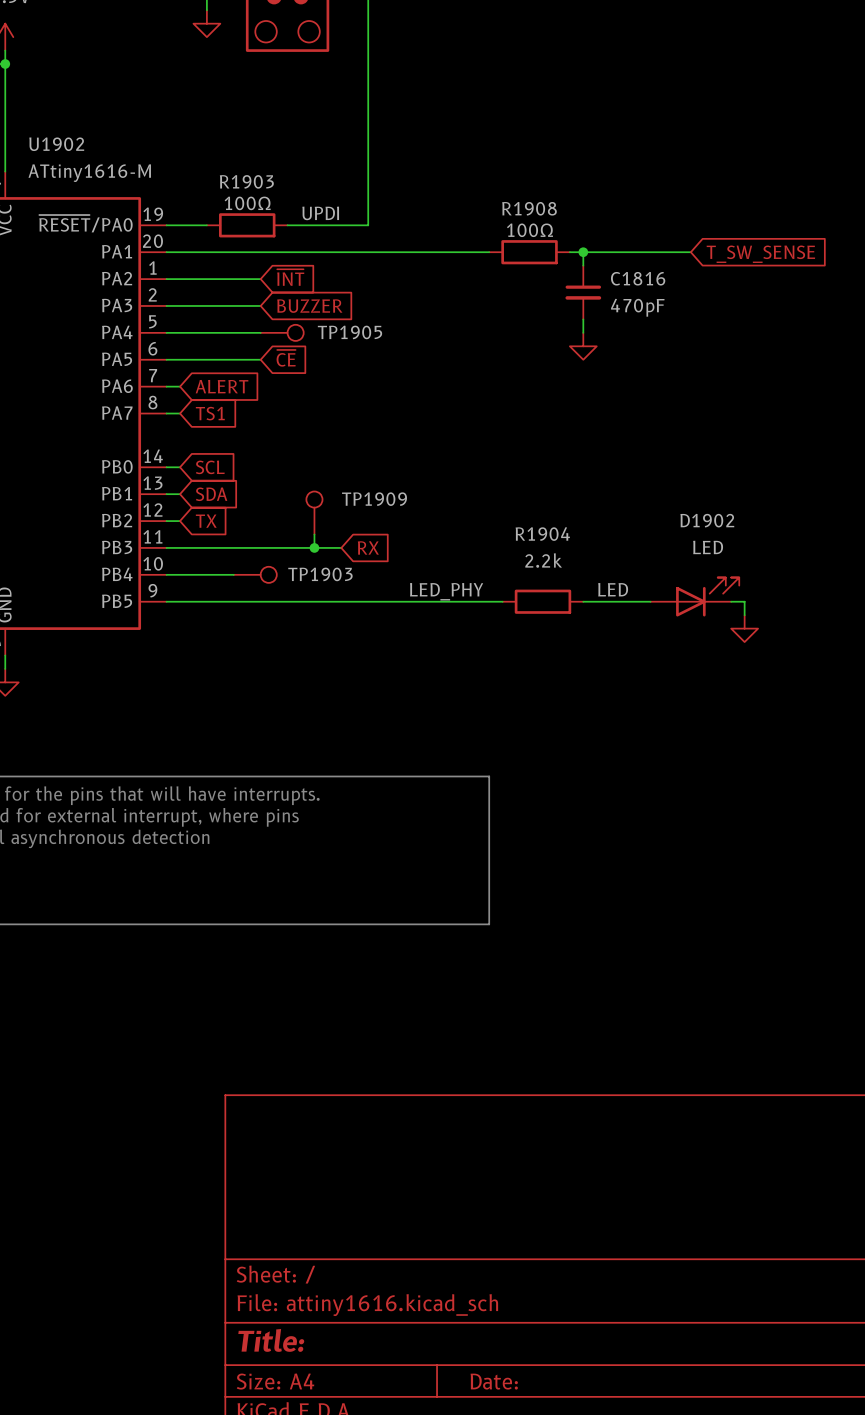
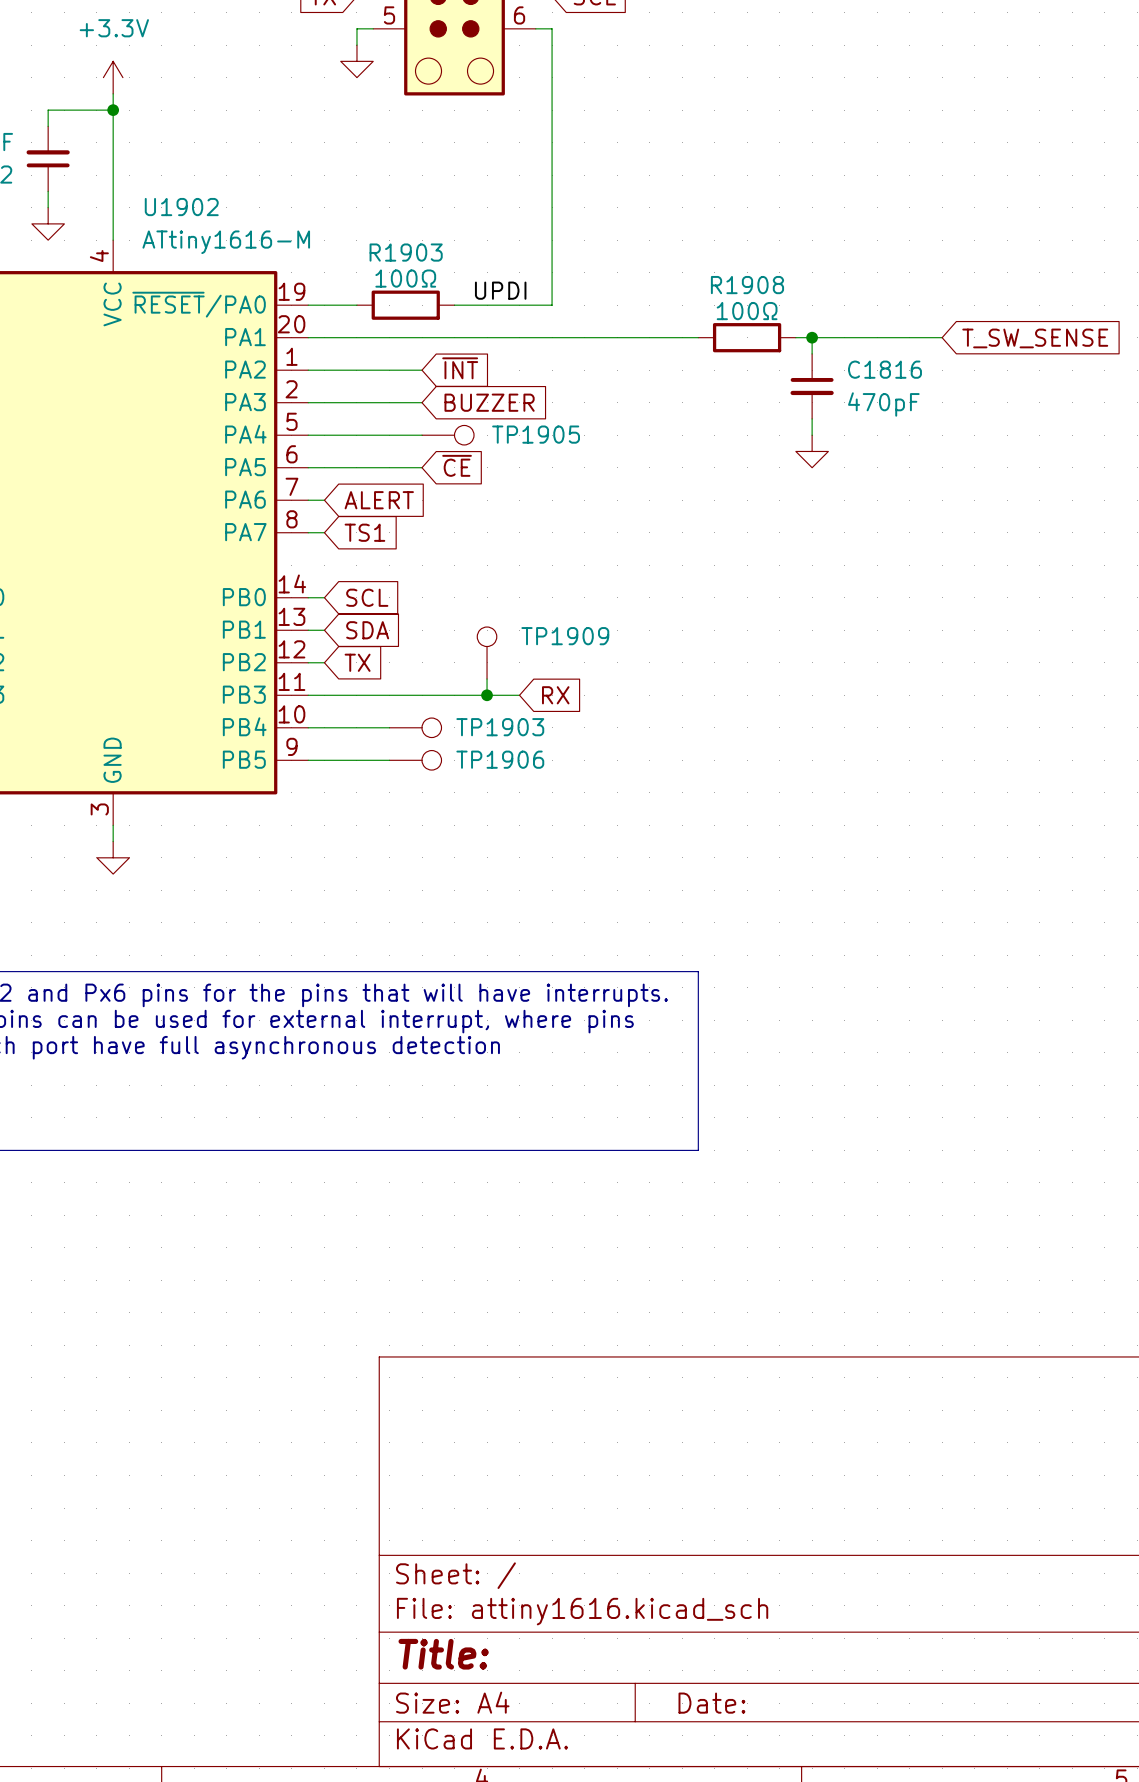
label: LED (613, 589) -> none
label: LED_PHY (446, 591) -> none
D1902: LED (694, 597) -> none
wire: (233, 601) (502, 601) -> none
TP1906: none -> (415, 760)
R1904: 2.2k (542, 601) -> none
wire: (583, 601) (650, 601) -> none
wire: (731, 601) (744, 601) (744, 615) -> none
power symbol: (744, 628) -> none

